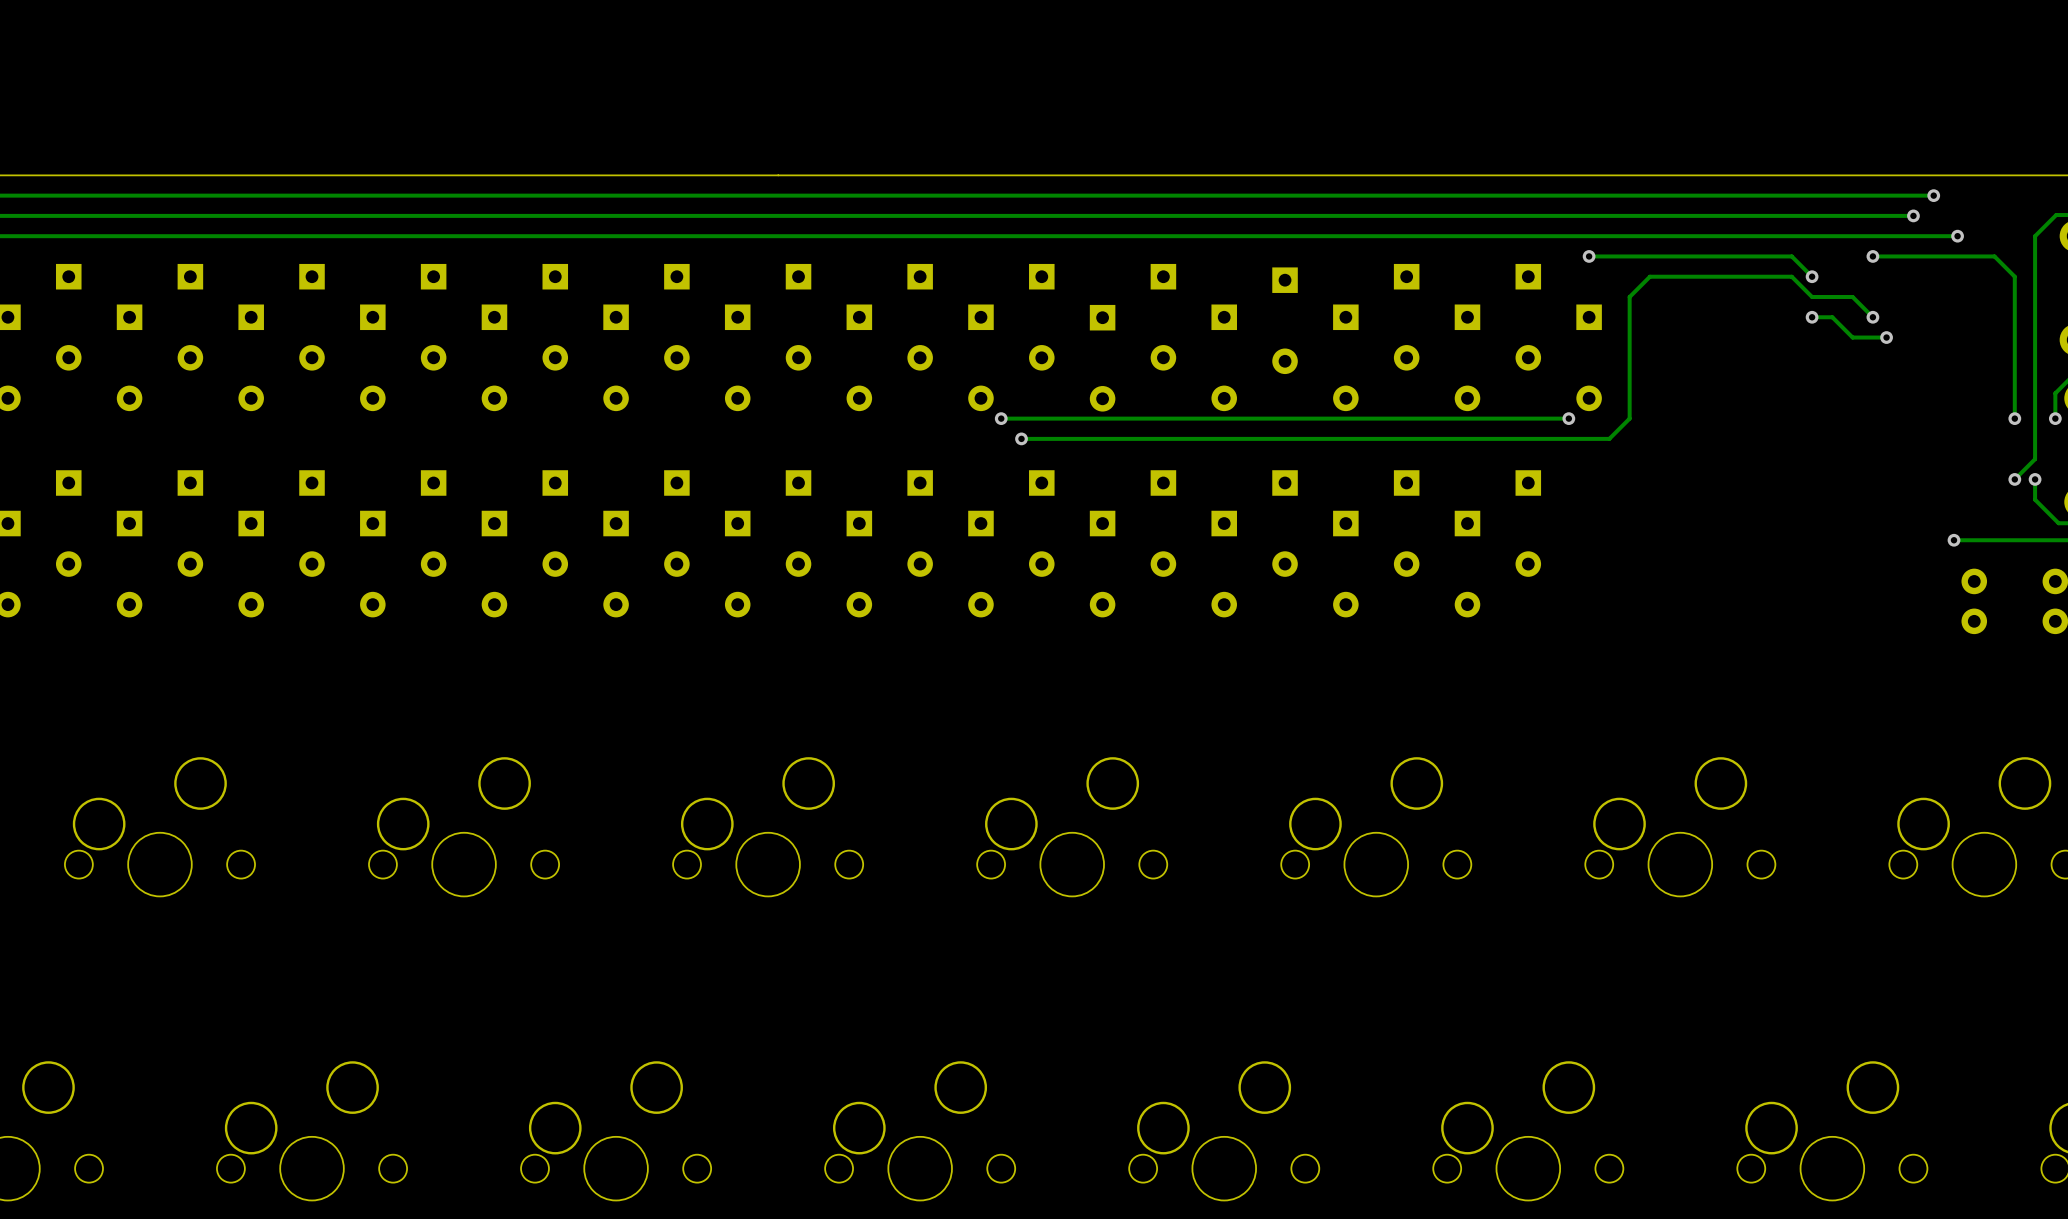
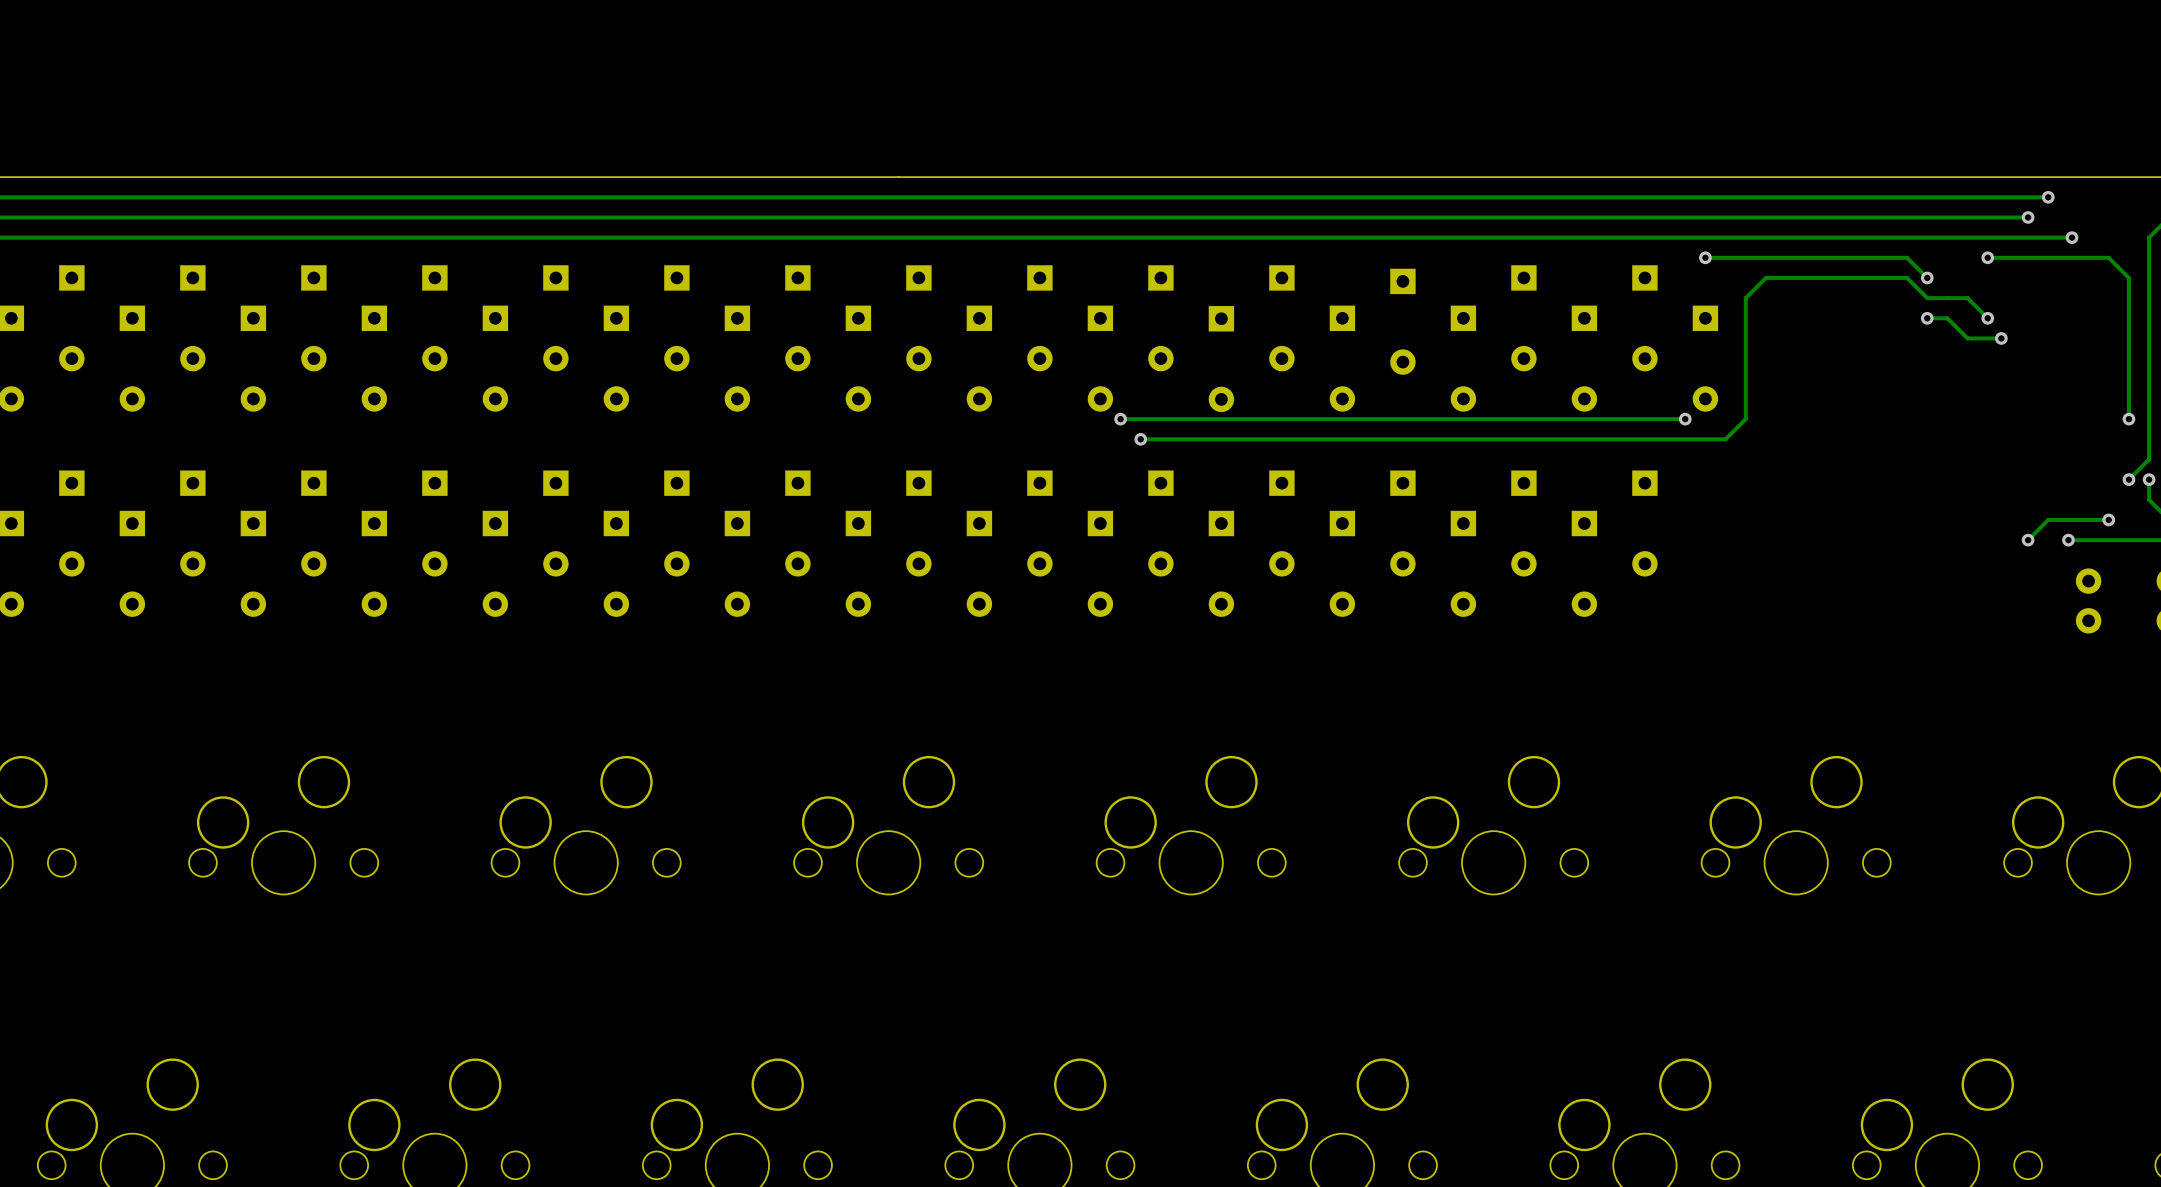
track: none -> (2108, 519) (2048, 519) (2028, 540)
via: none -> (2108, 519)
via: none -> (2028, 540)

